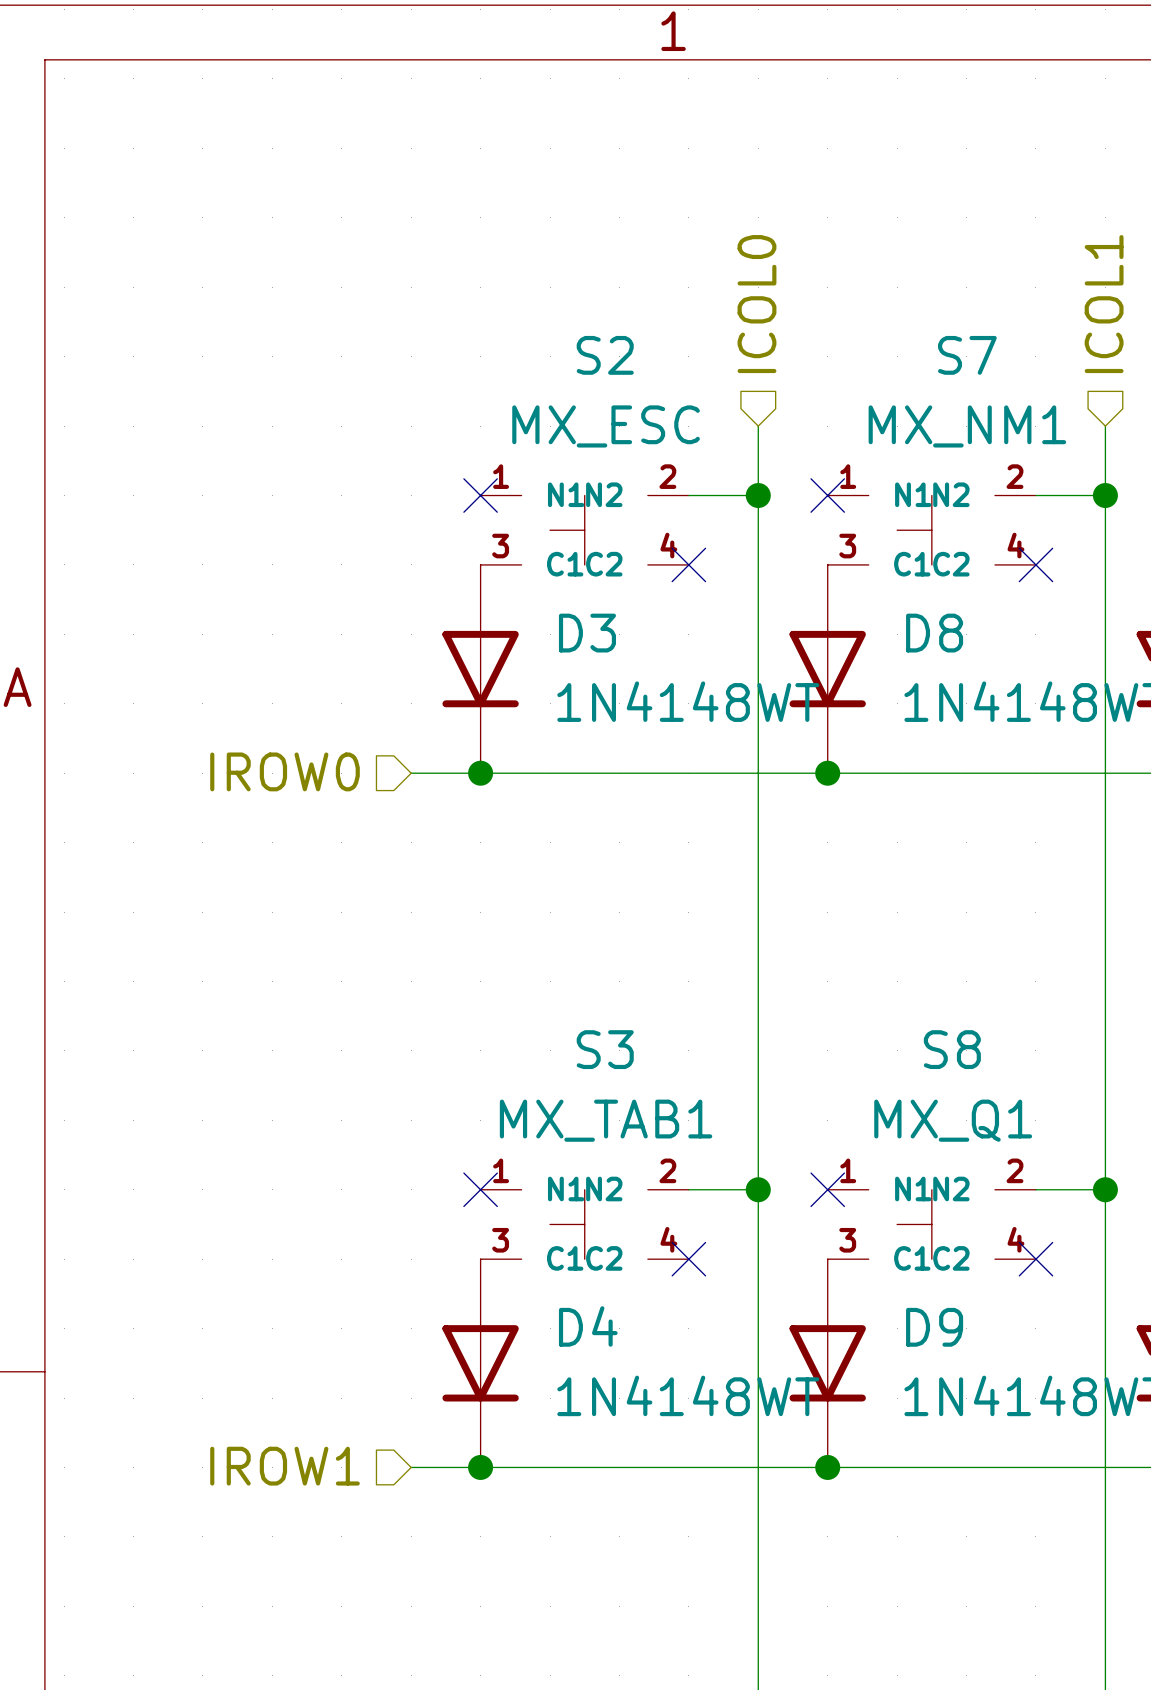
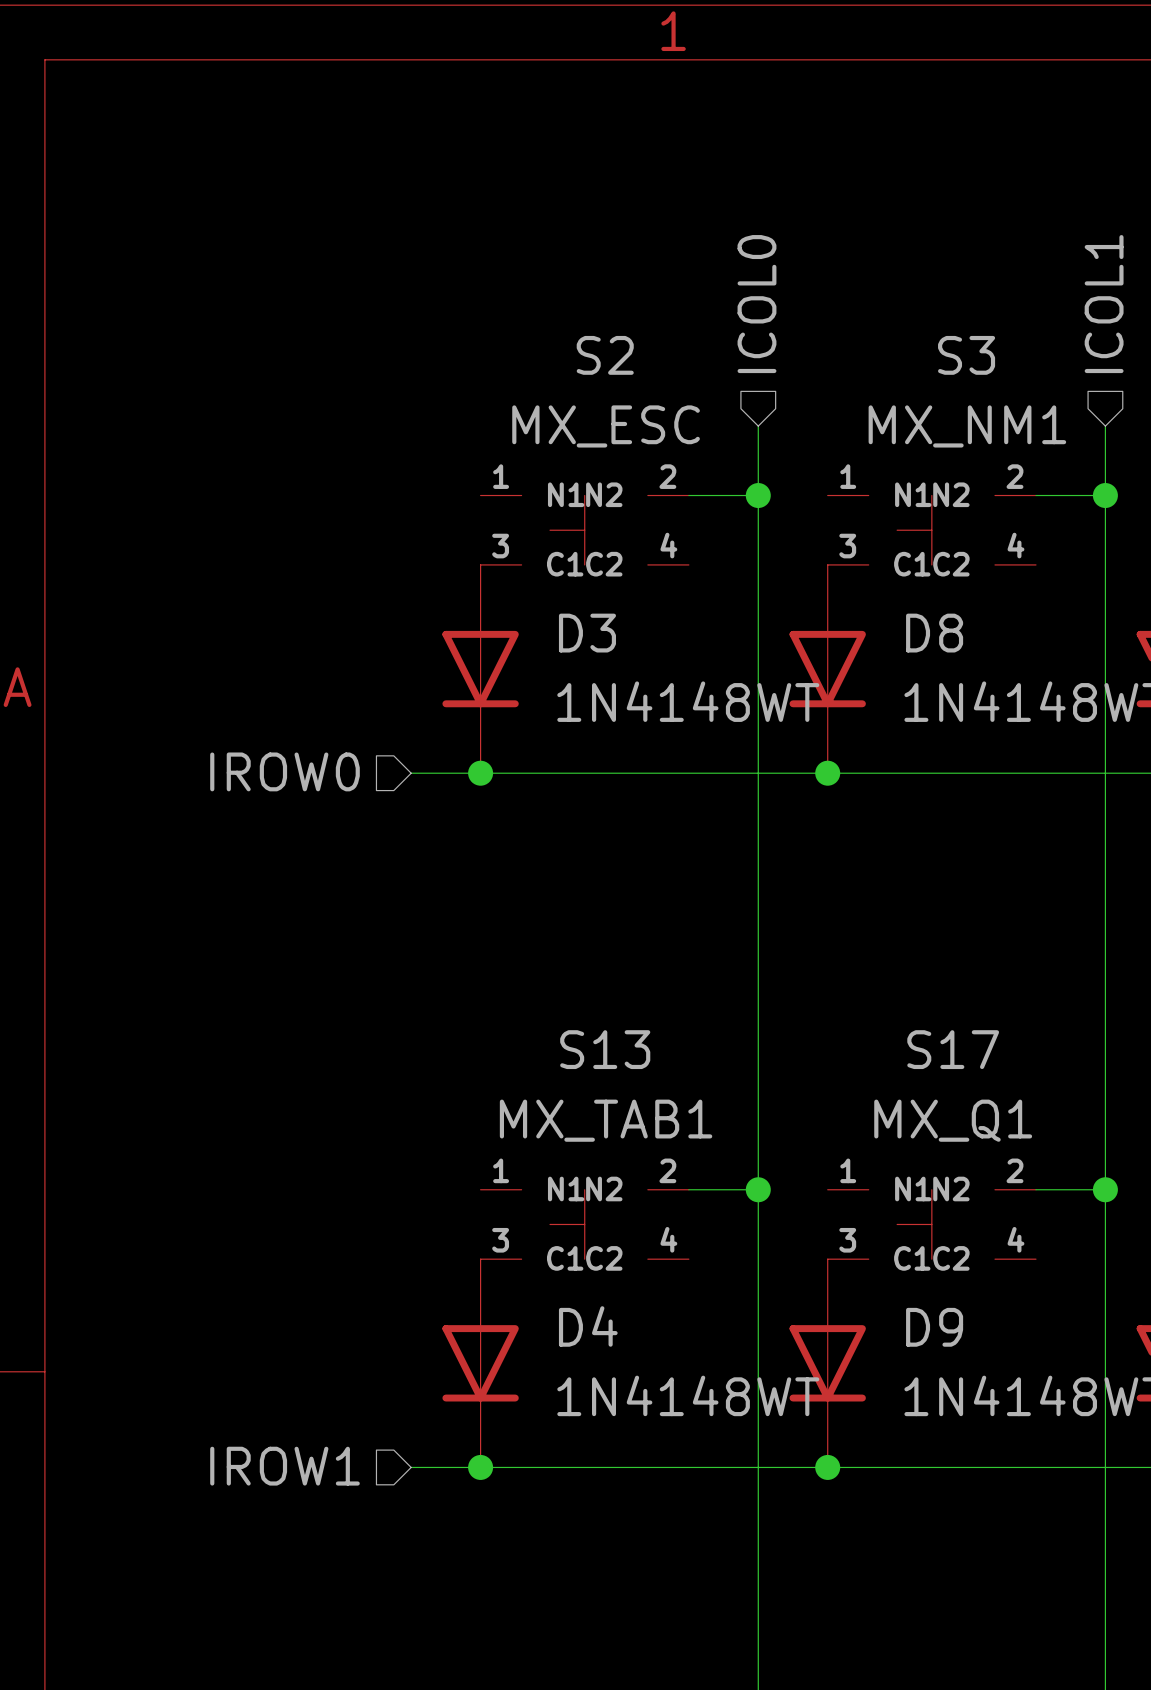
S7 name: S7 (967, 355) -> S3 (966, 355)
no-connect mark: (480, 495) -> none
no-connect mark: (827, 495) -> none
no-connect mark: (688, 564) -> none
no-connect mark: (1035, 564) -> none
S3 name: S3 (605, 1049) -> S13 (605, 1049)
S8 name: S8 (952, 1049) -> S17 (953, 1049)
no-connect mark: (480, 1189) -> none
no-connect mark: (827, 1189) -> none
no-connect mark: (688, 1259) -> none
no-connect mark: (1035, 1259) -> none

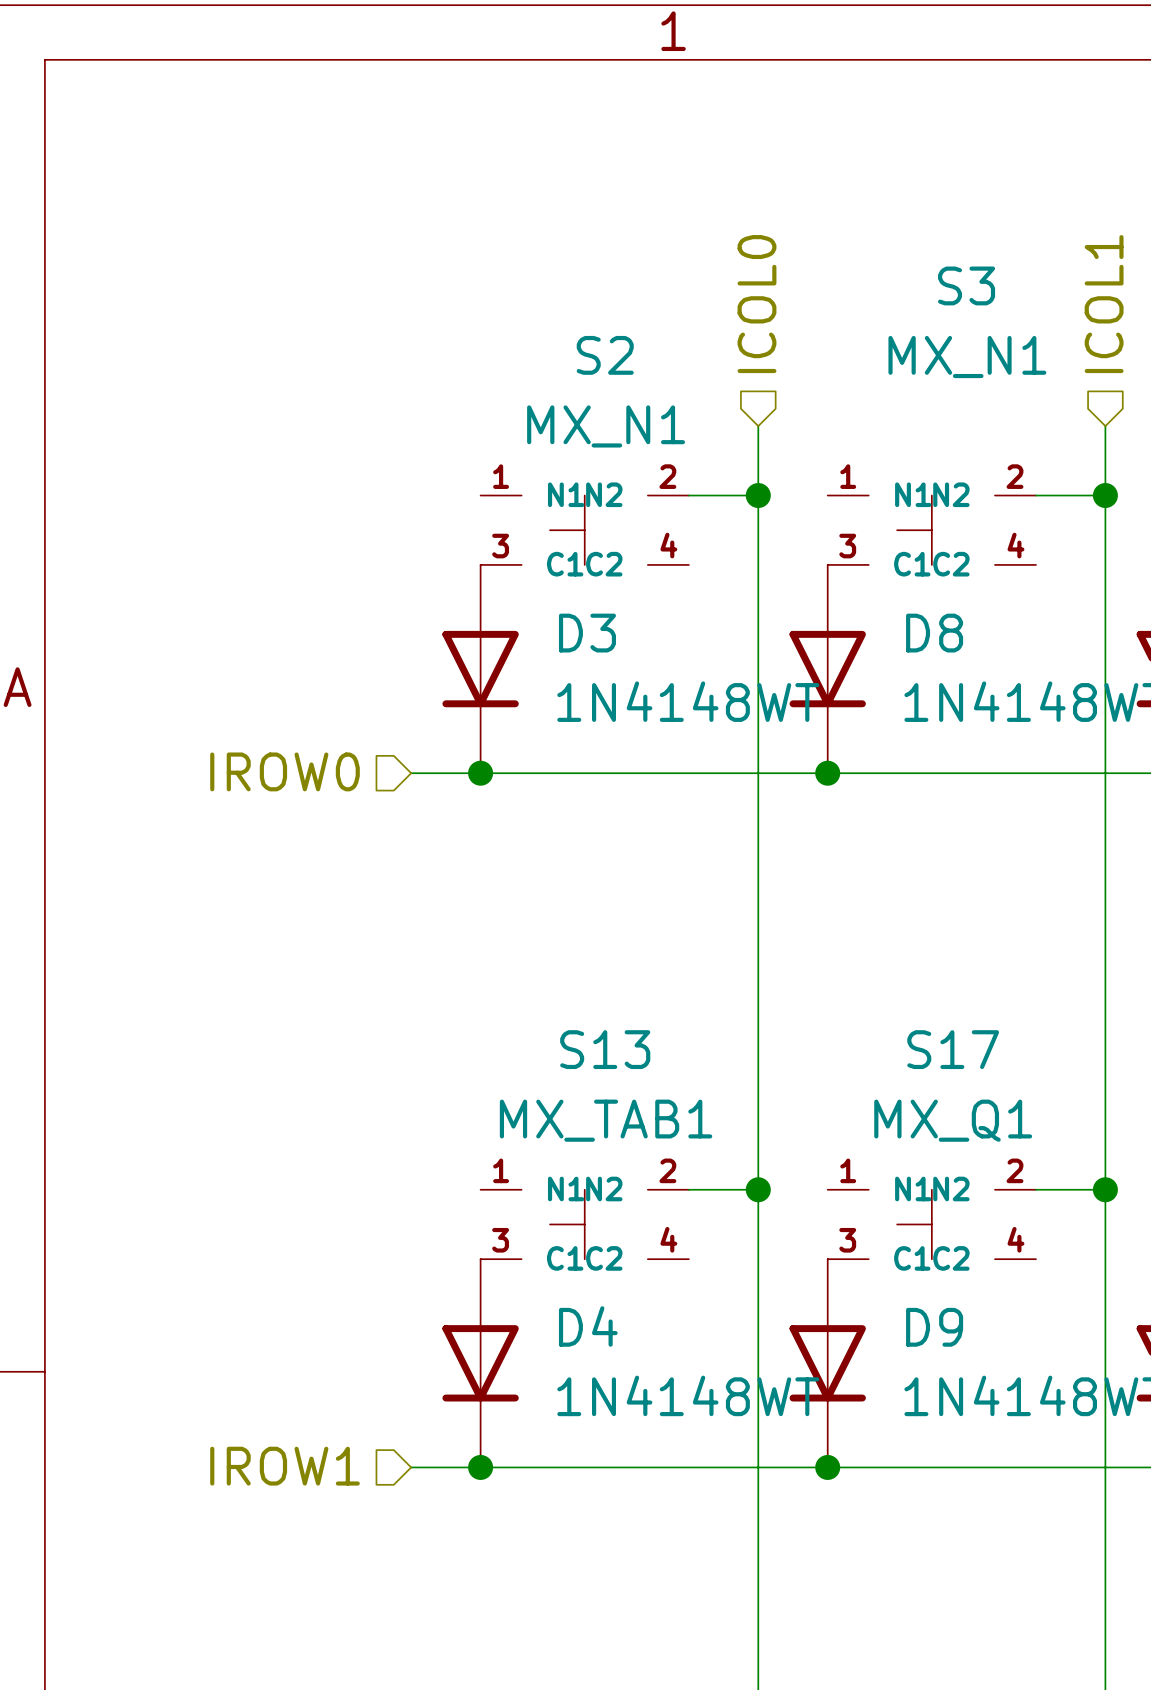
S3 name position: S3 (966, 355) -> S3 (966, 285)
S2 value: MX_ESC (606, 426) -> MX_N1 (606, 426)
S3 value: MX_NM1 (967, 426) -> MX_N1 (967, 357)

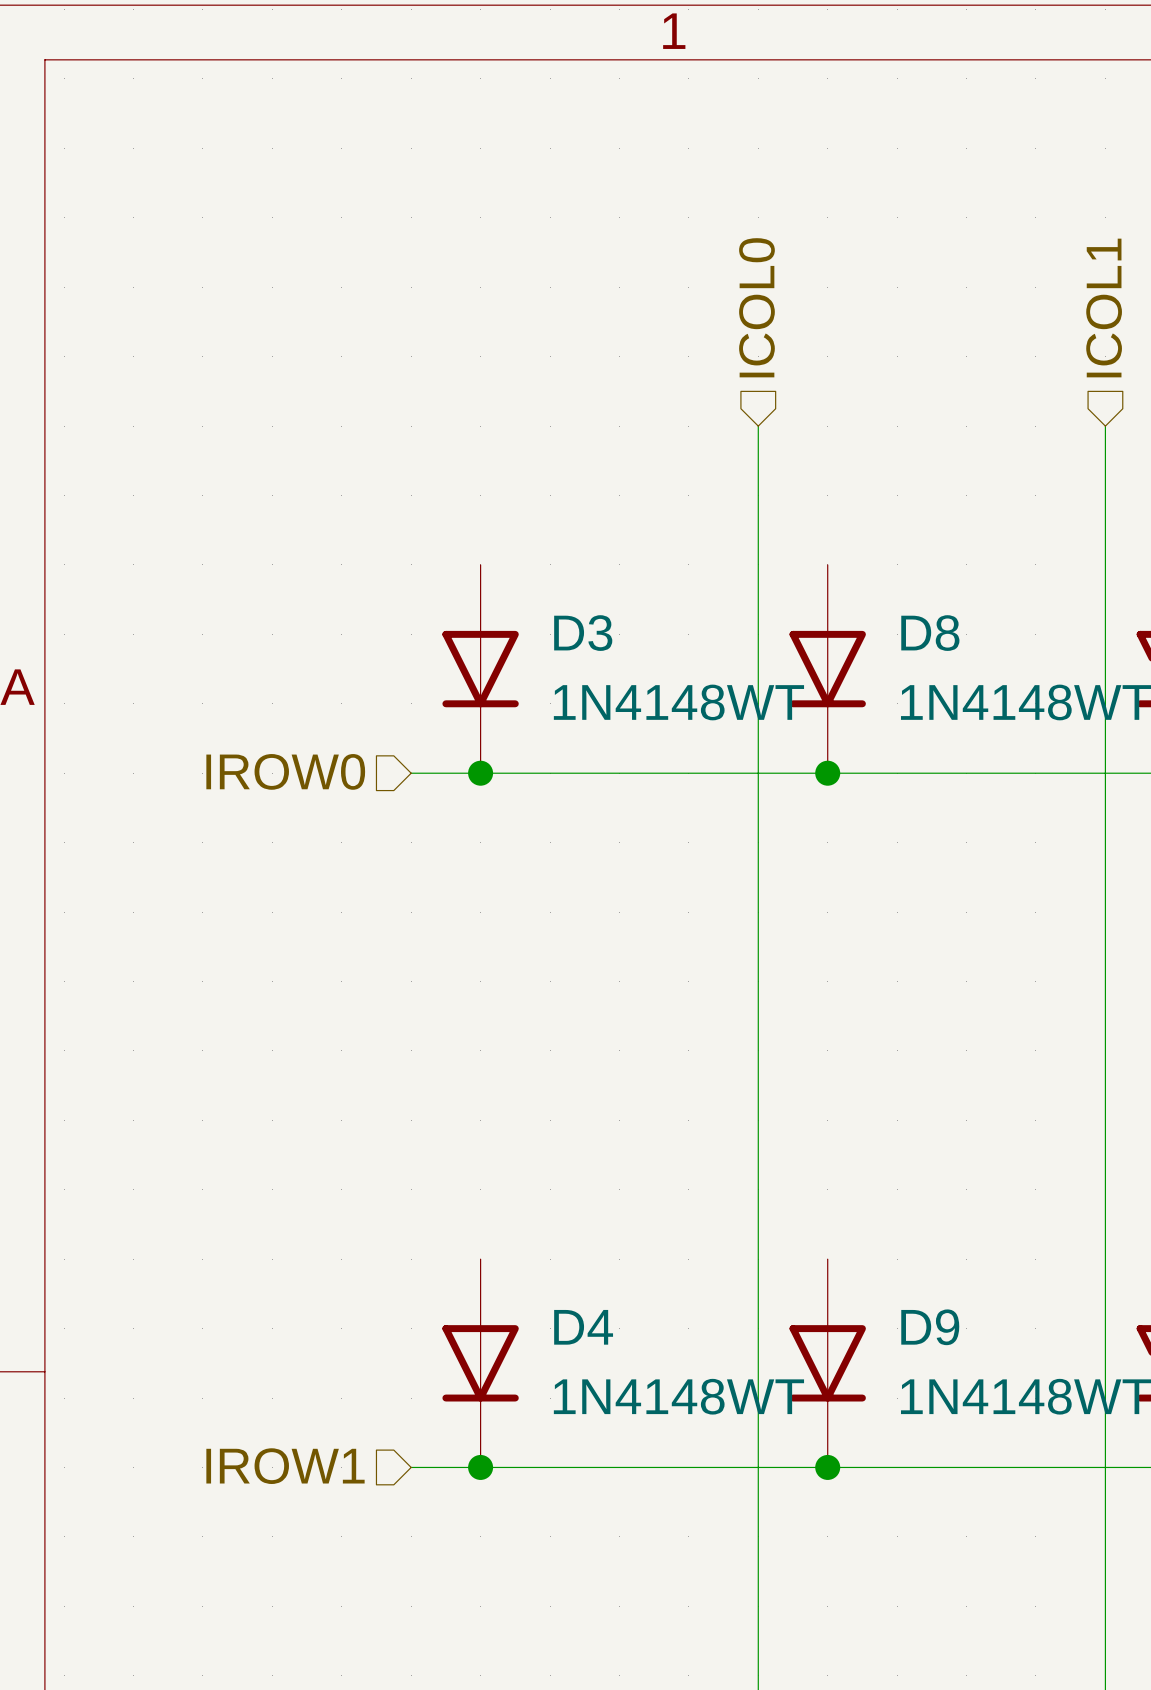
wire: (688, 495) (758, 495) -> none
junction: (758, 495) -> none
wire: (1035, 495) (1105, 495) -> none
junction: (1105, 495) -> none
S2: MX_N1 (584, 530) -> none
S3: MX_N1 (931, 530) -> none
wire: (688, 1189) (758, 1189) -> none
junction: (758, 1189) -> none
wire: (1035, 1189) (1105, 1189) -> none
junction: (1105, 1189) -> none
S13: MX_TAB1 (584, 1224) -> none
S17: MX_Q1 (931, 1224) -> none

